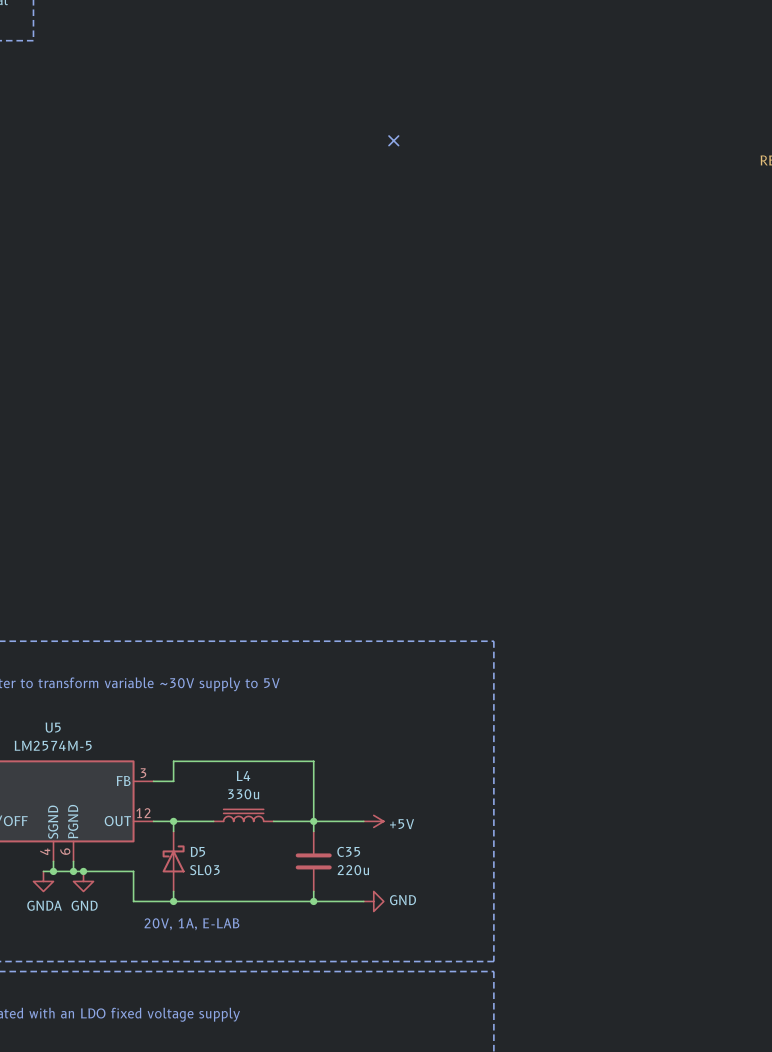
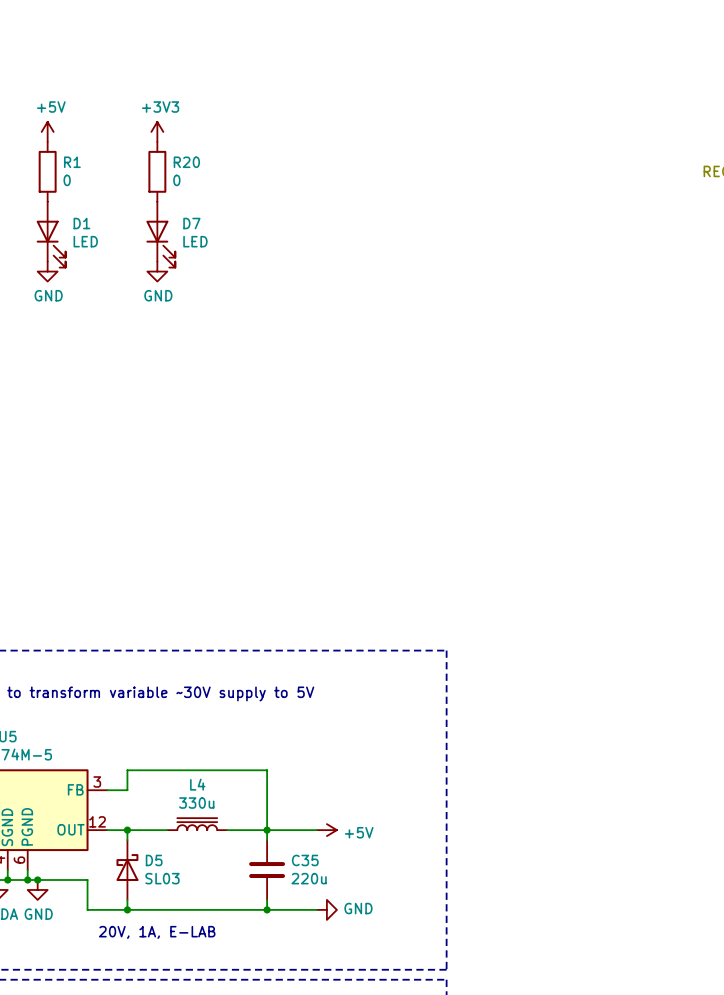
power symbol: none -> +5V (47, 131)
power symbol: none -> +3V3 (157, 131)
no-connect mark: (393, 140) -> none
R1: none -> 0 (47, 171)
R20: none -> 0 (157, 171)
D1: none -> LED (51, 234)
D7: none -> LED (160, 234)
power symbol: none -> GND (47, 271)
power symbol: none -> GND (157, 271)

